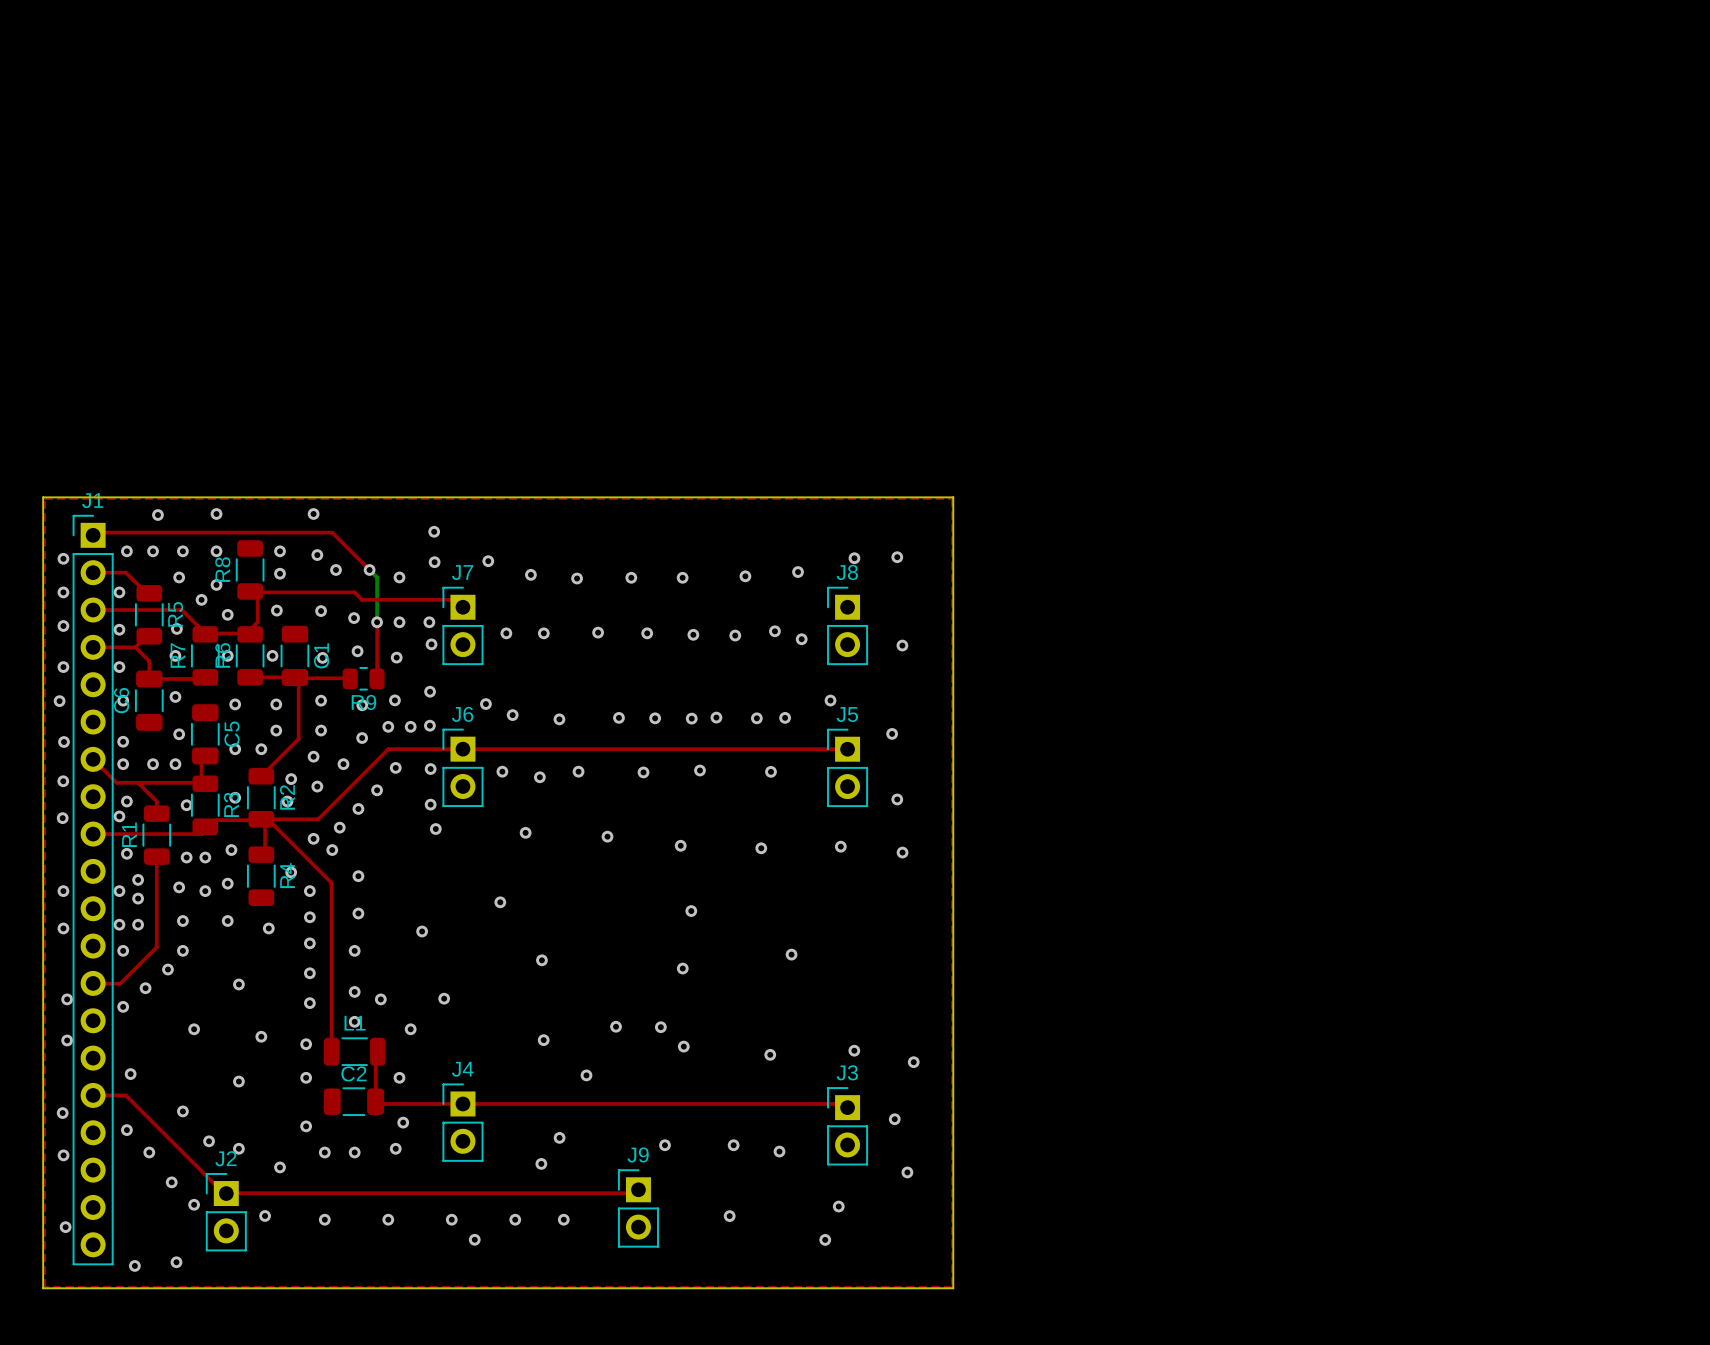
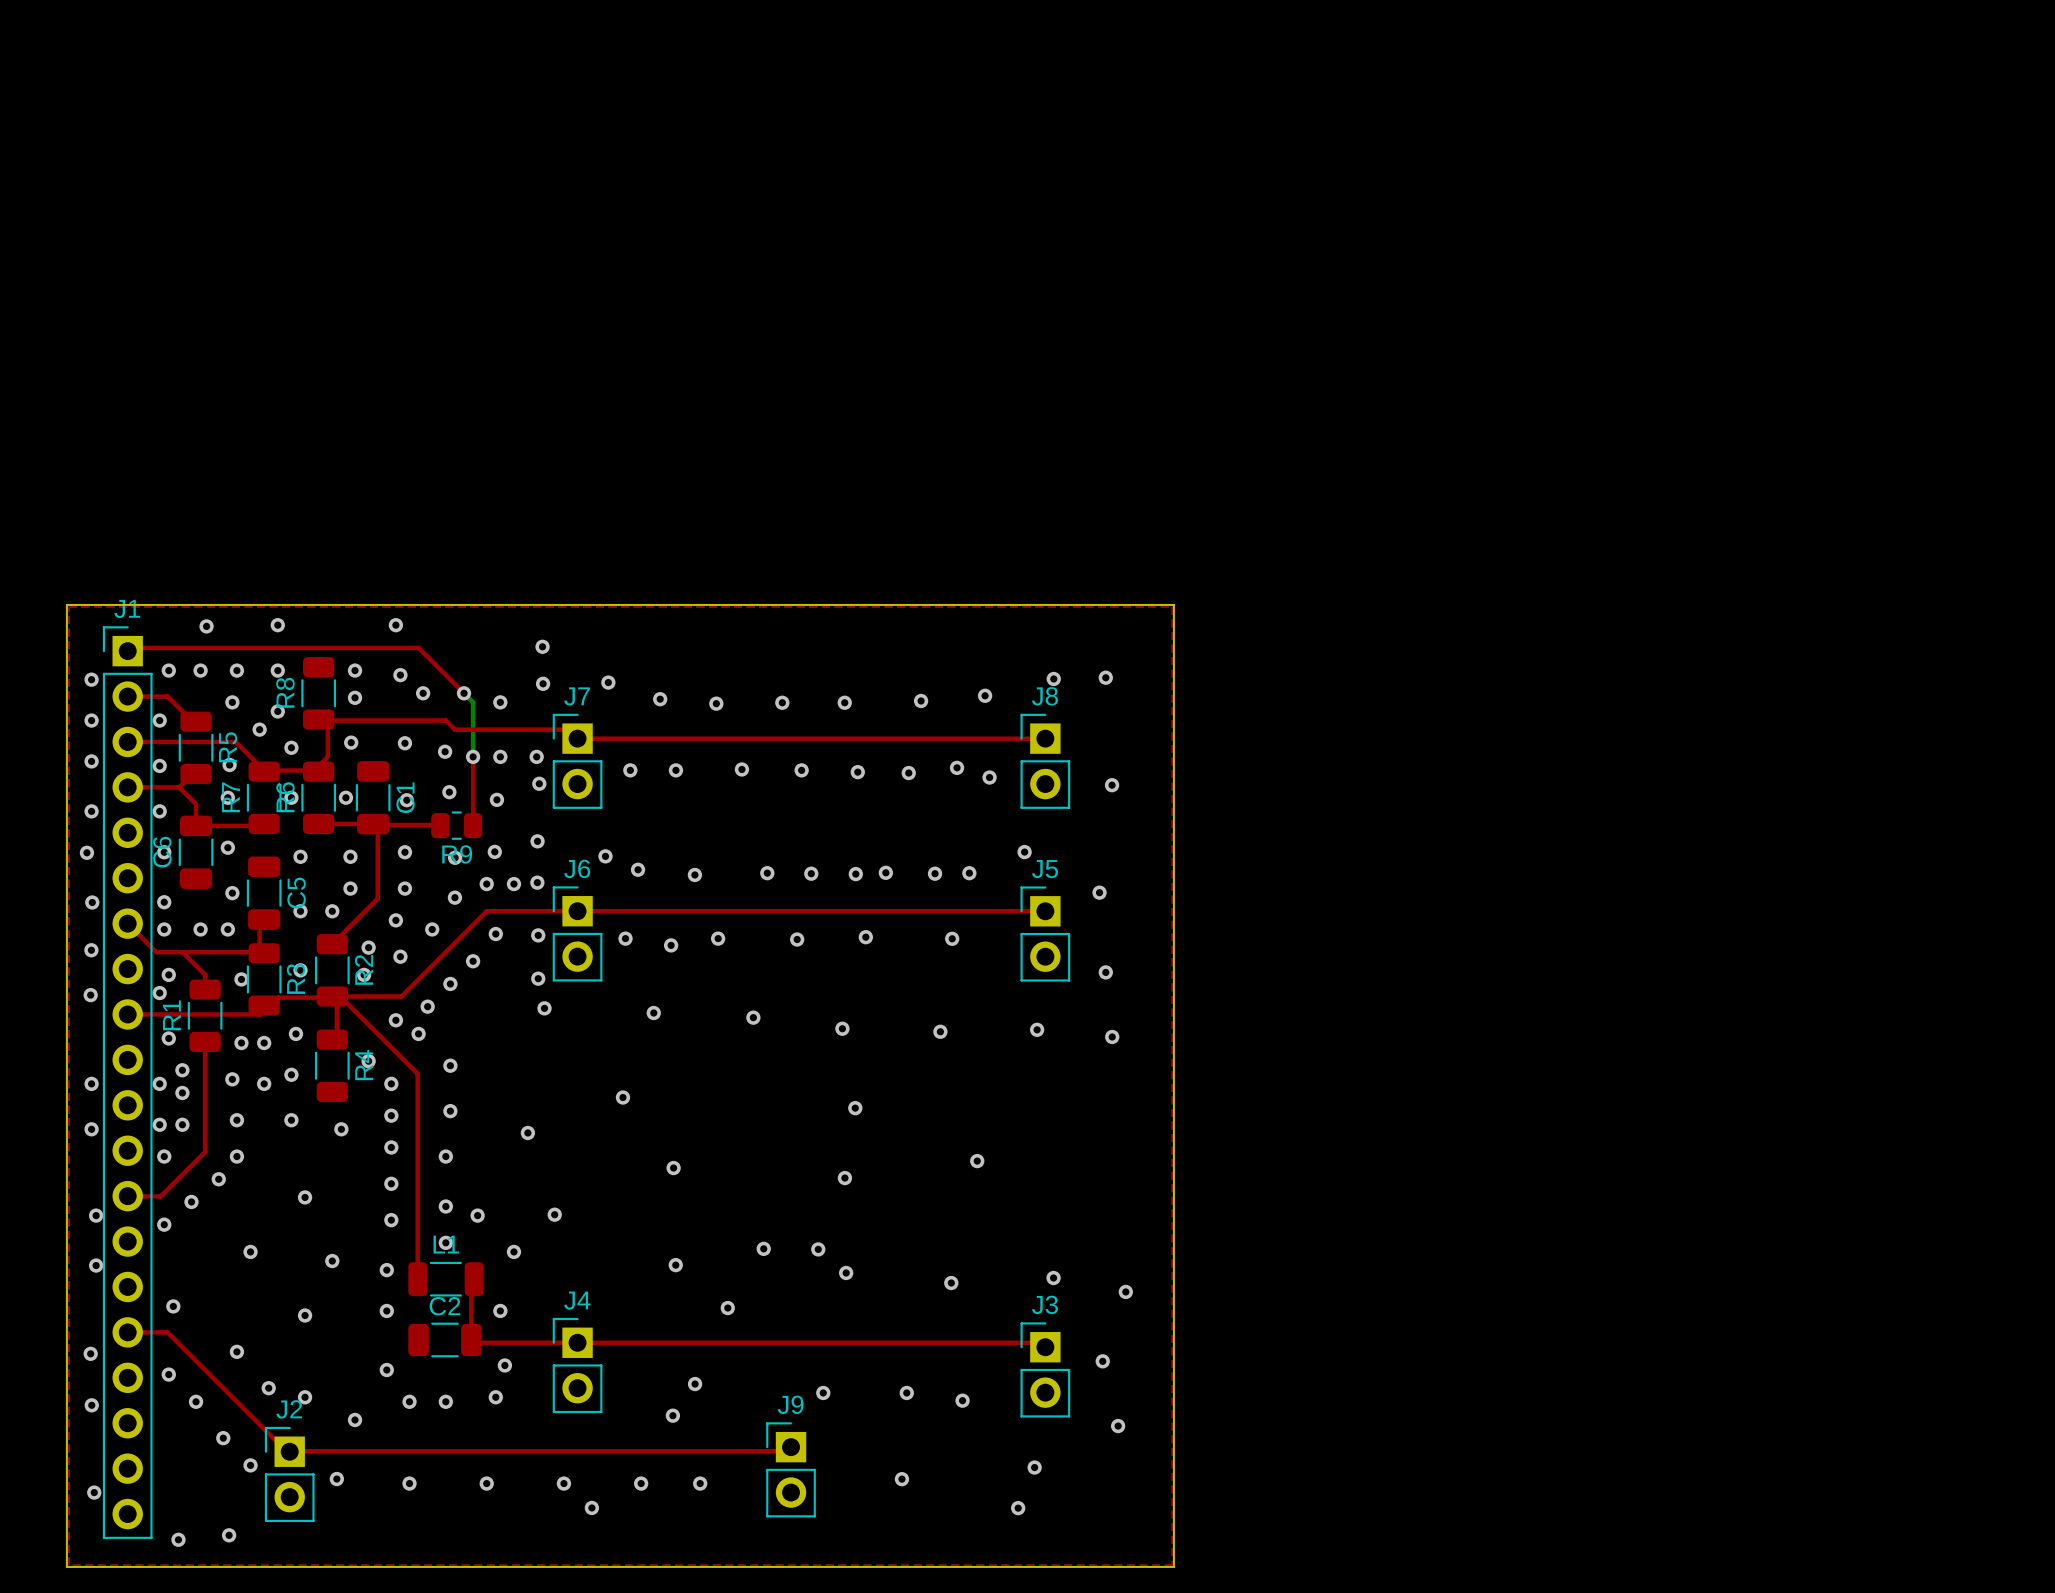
top track: none -> (577, 738) (1045, 738)

